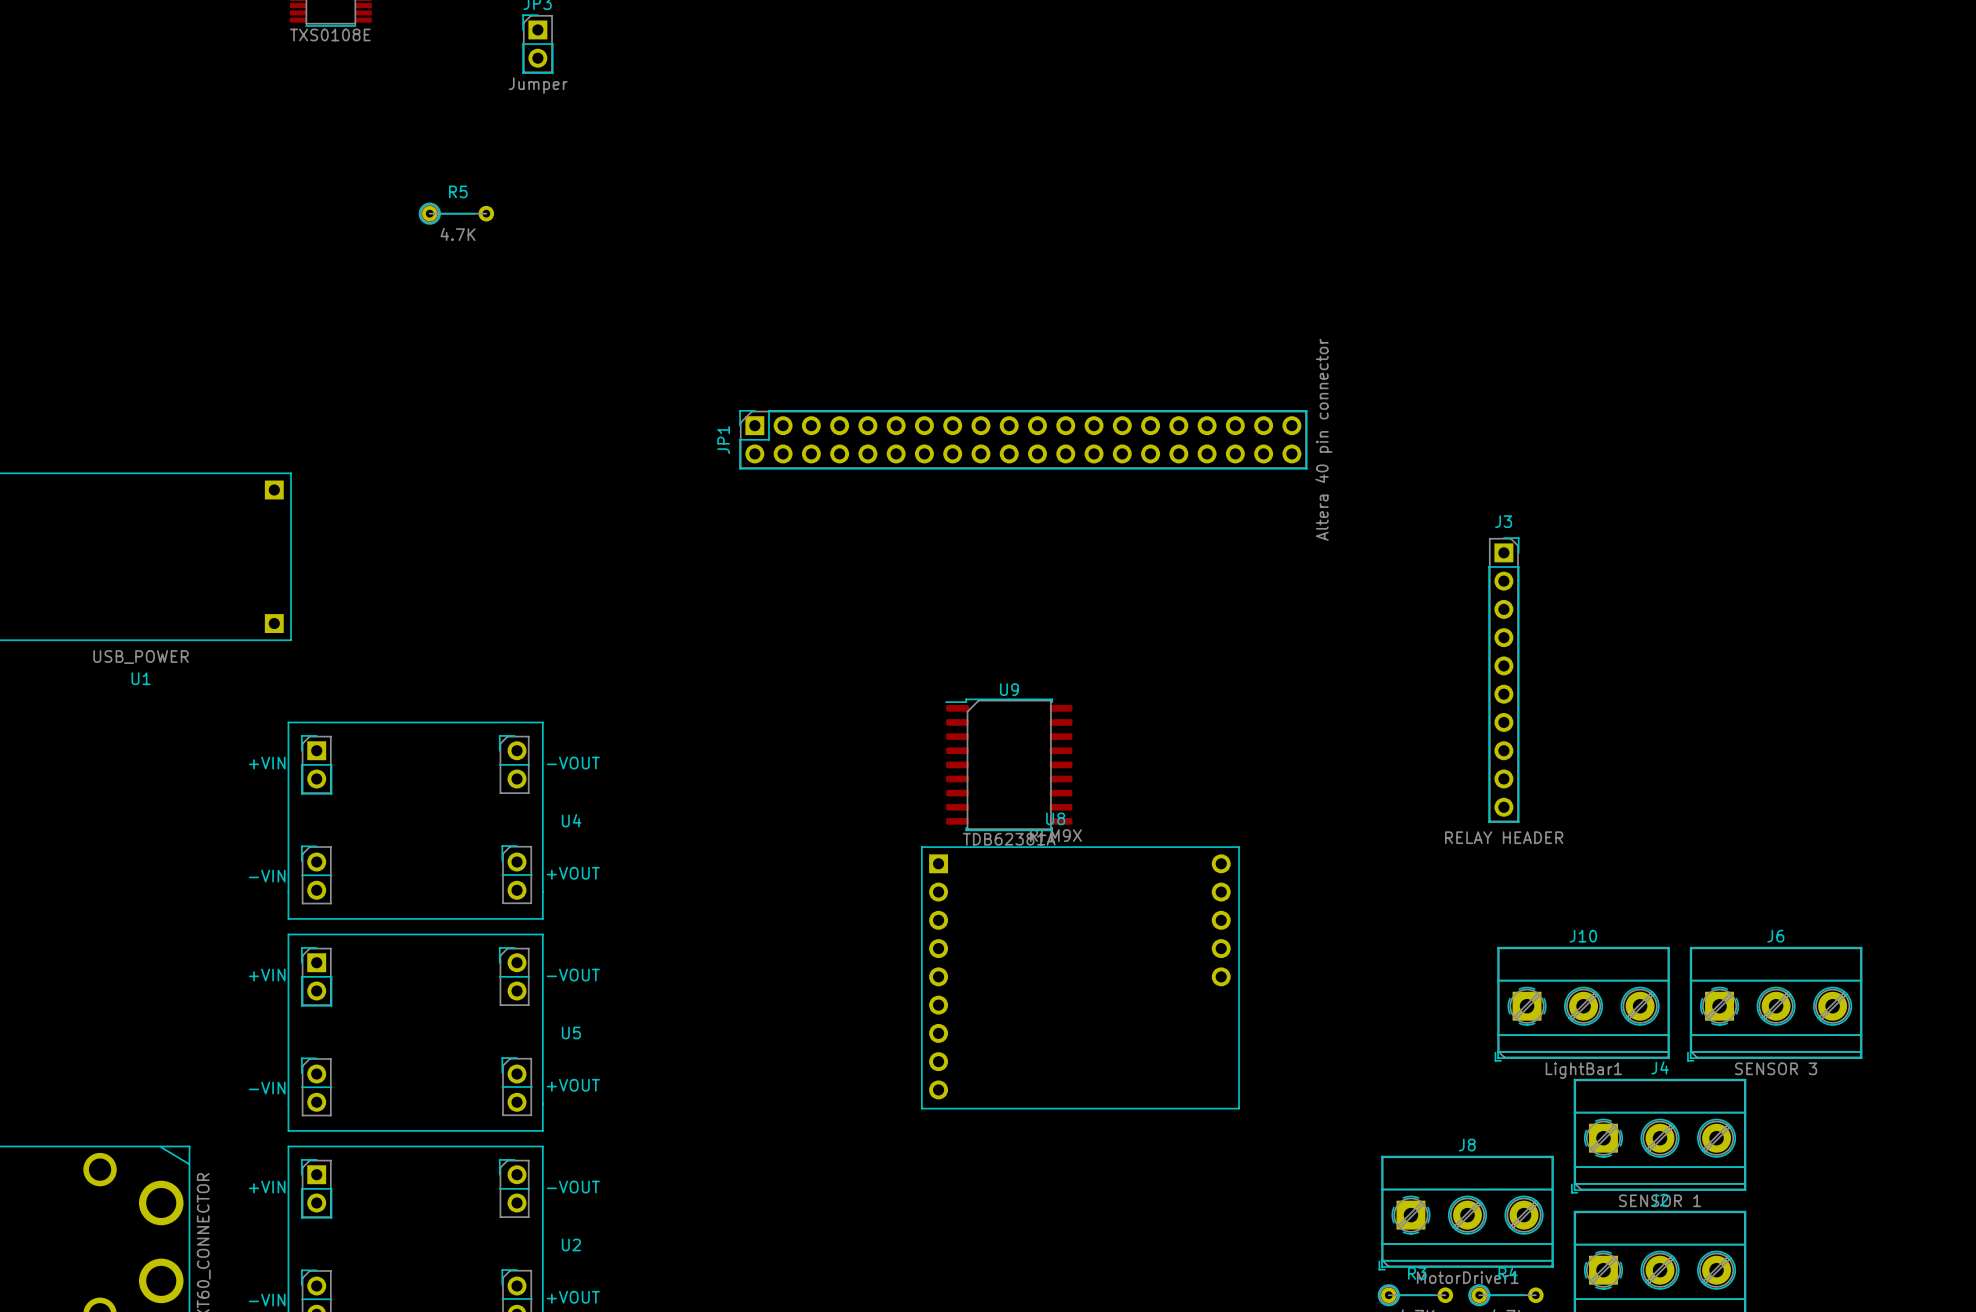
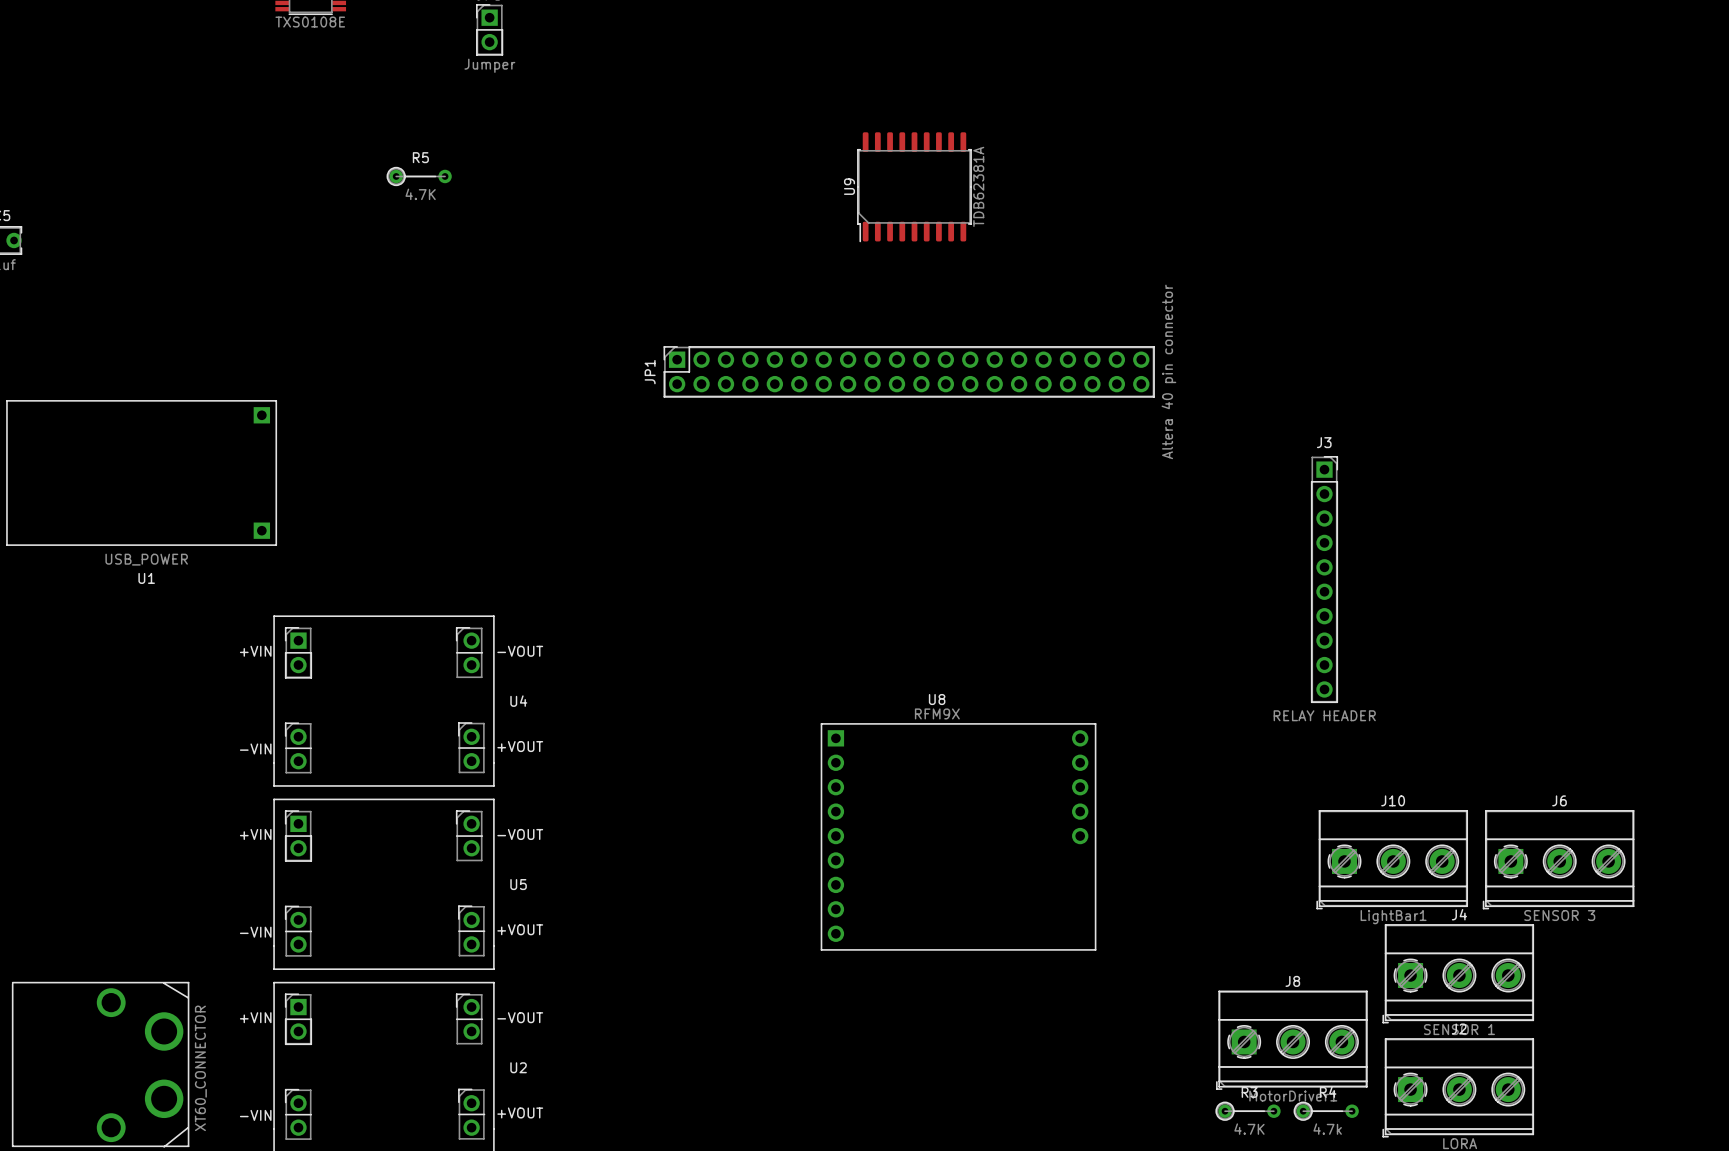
U9 rotation: 0° (1008, 764) -> 90° counterclockwise (914, 187)
U9 position: (1008, 764) -> (914, 187)

